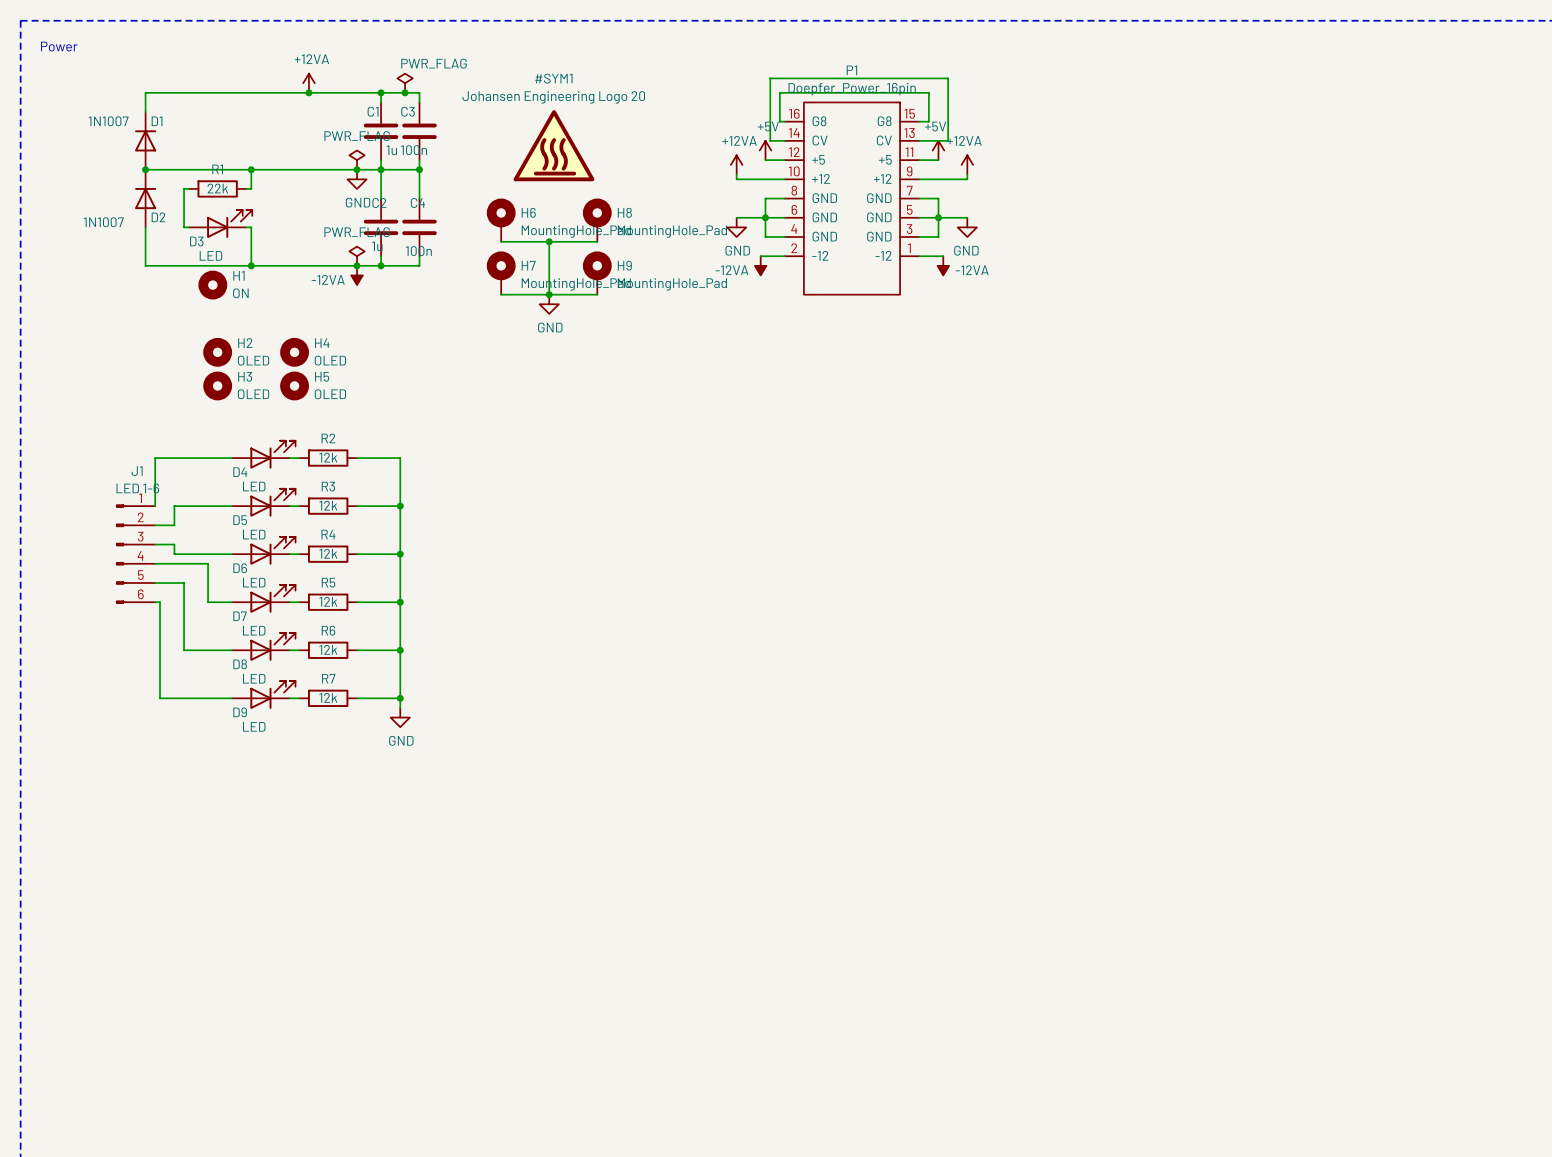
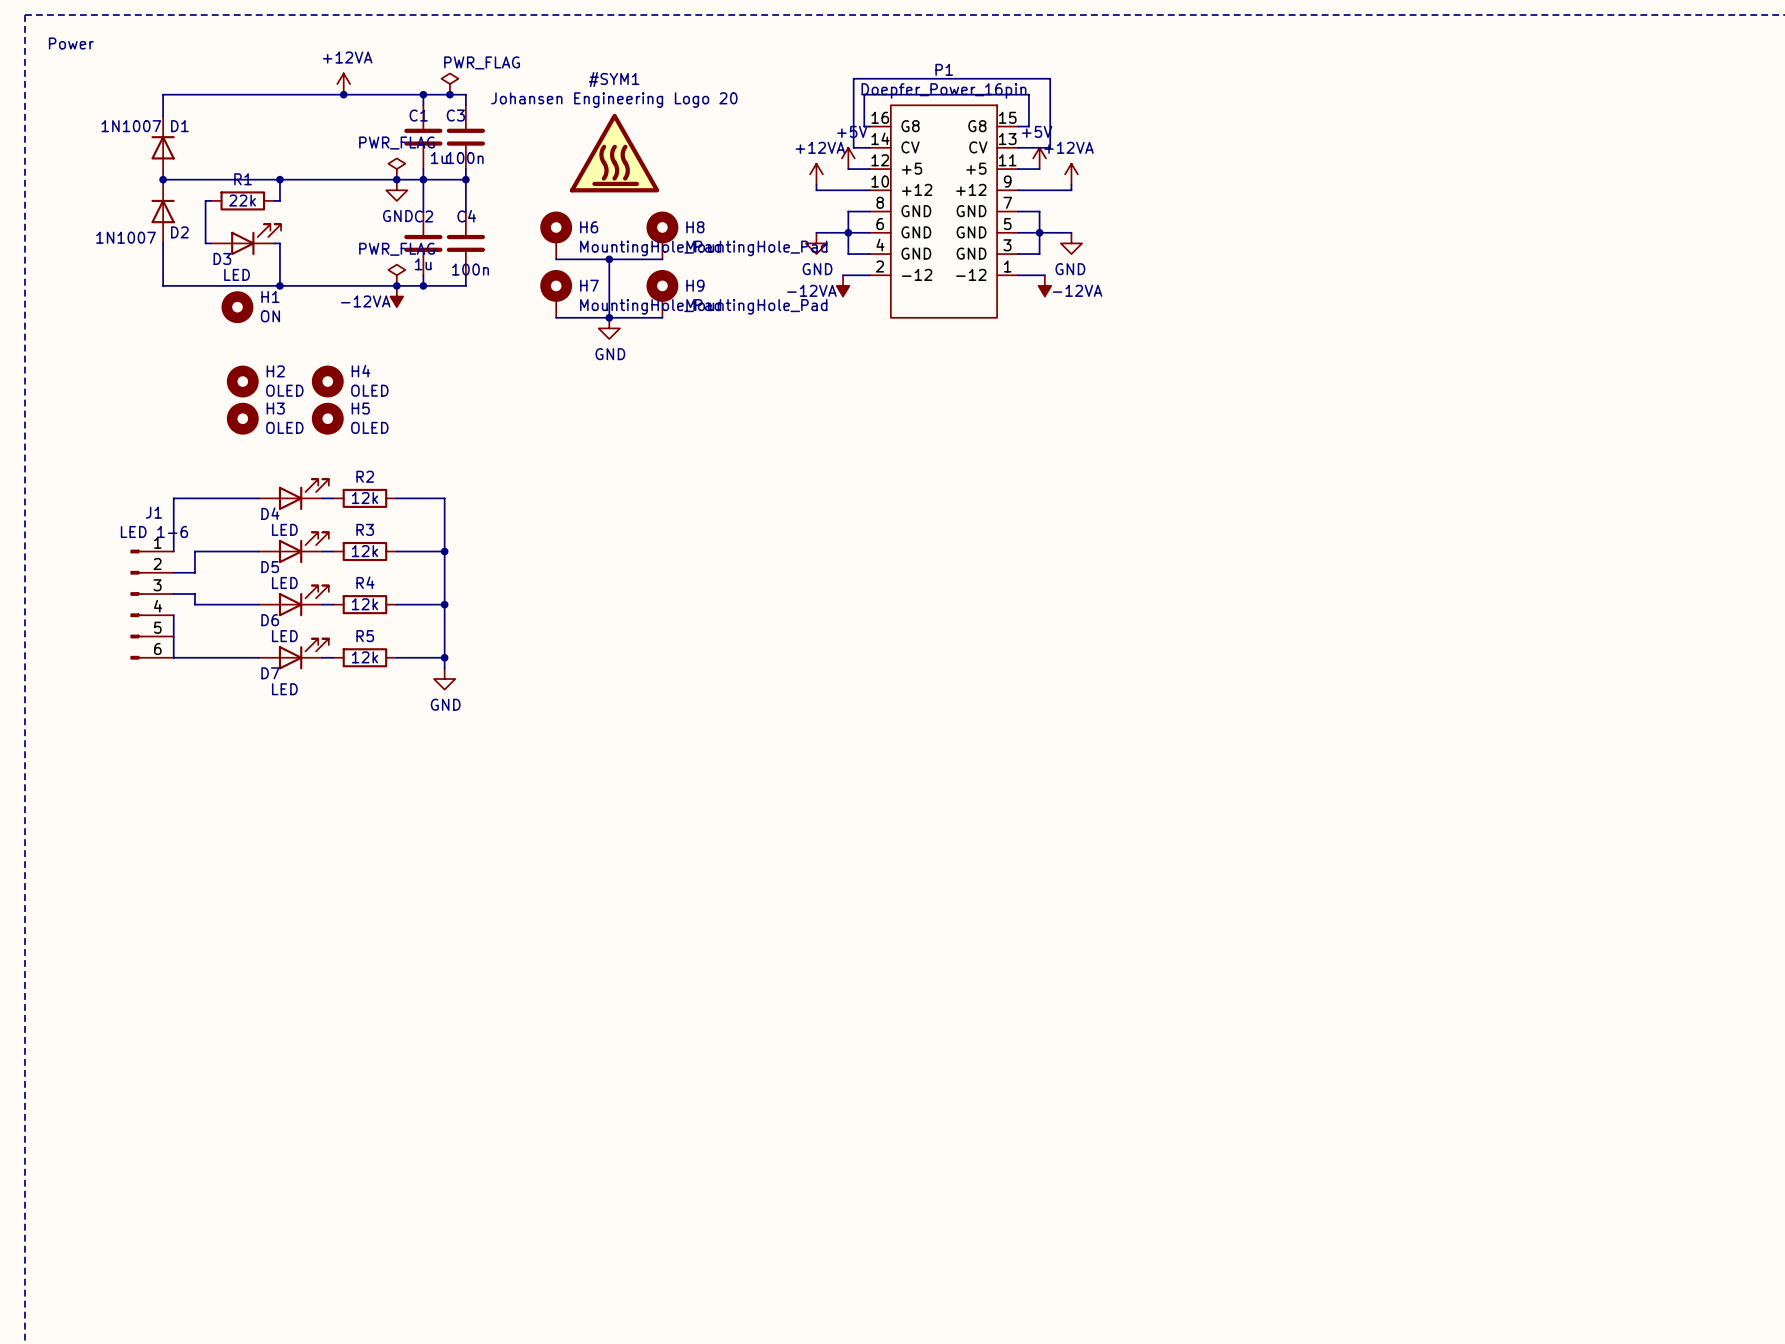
wire: (155, 563) (208, 563) (208, 602) -> (179, 657) (232, 657)
wire: none -> (173, 615) (173, 657)
wire: (155, 583) (184, 583) (184, 650) (232, 650) -> none
wire: (160, 602) (160, 698) (232, 698) -> none
wire: (400, 611) (400, 707) -> none
D8: LED (263, 646) -> none
wire: (289, 650) (299, 650) -> none
R6: 12k (328, 650) -> none
wire: (357, 650) (400, 650) -> none
junction: (400, 650) -> none
D9: LED (263, 694) -> none
wire: (289, 698) (299, 698) -> none
R7: 12k (328, 698) -> none
wire: (357, 698) (400, 698) -> none
junction: (400, 698) -> none
power symbol position: GND (400, 717) -> GND (444, 679)

